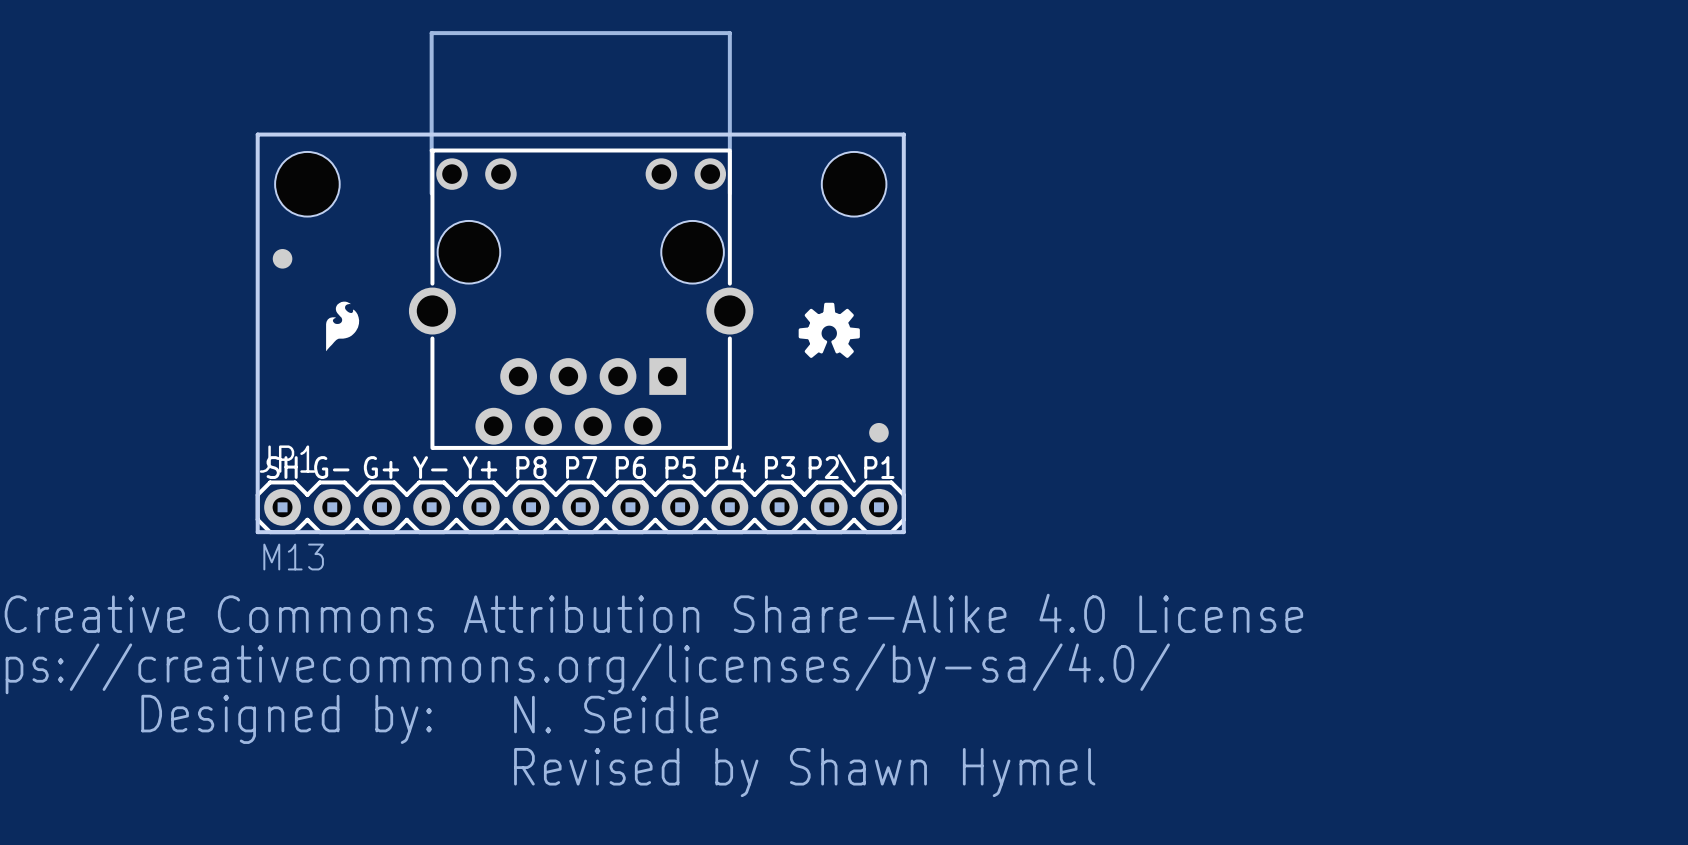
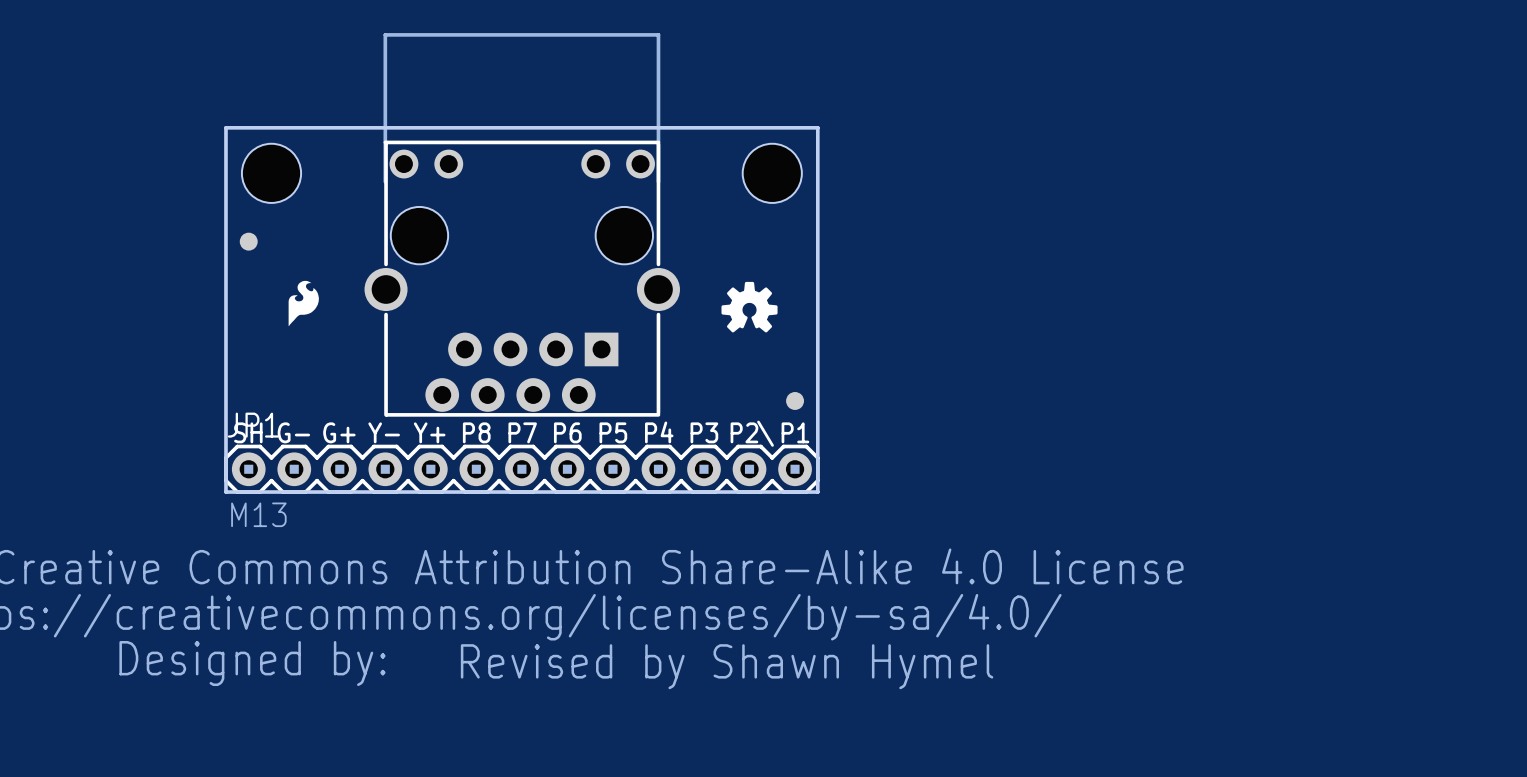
text: N. Seidle (616, 714) -> none
text position: Revised by Shawn Hymel (804, 772) -> Revised by Shawn Hymel (727, 666)

